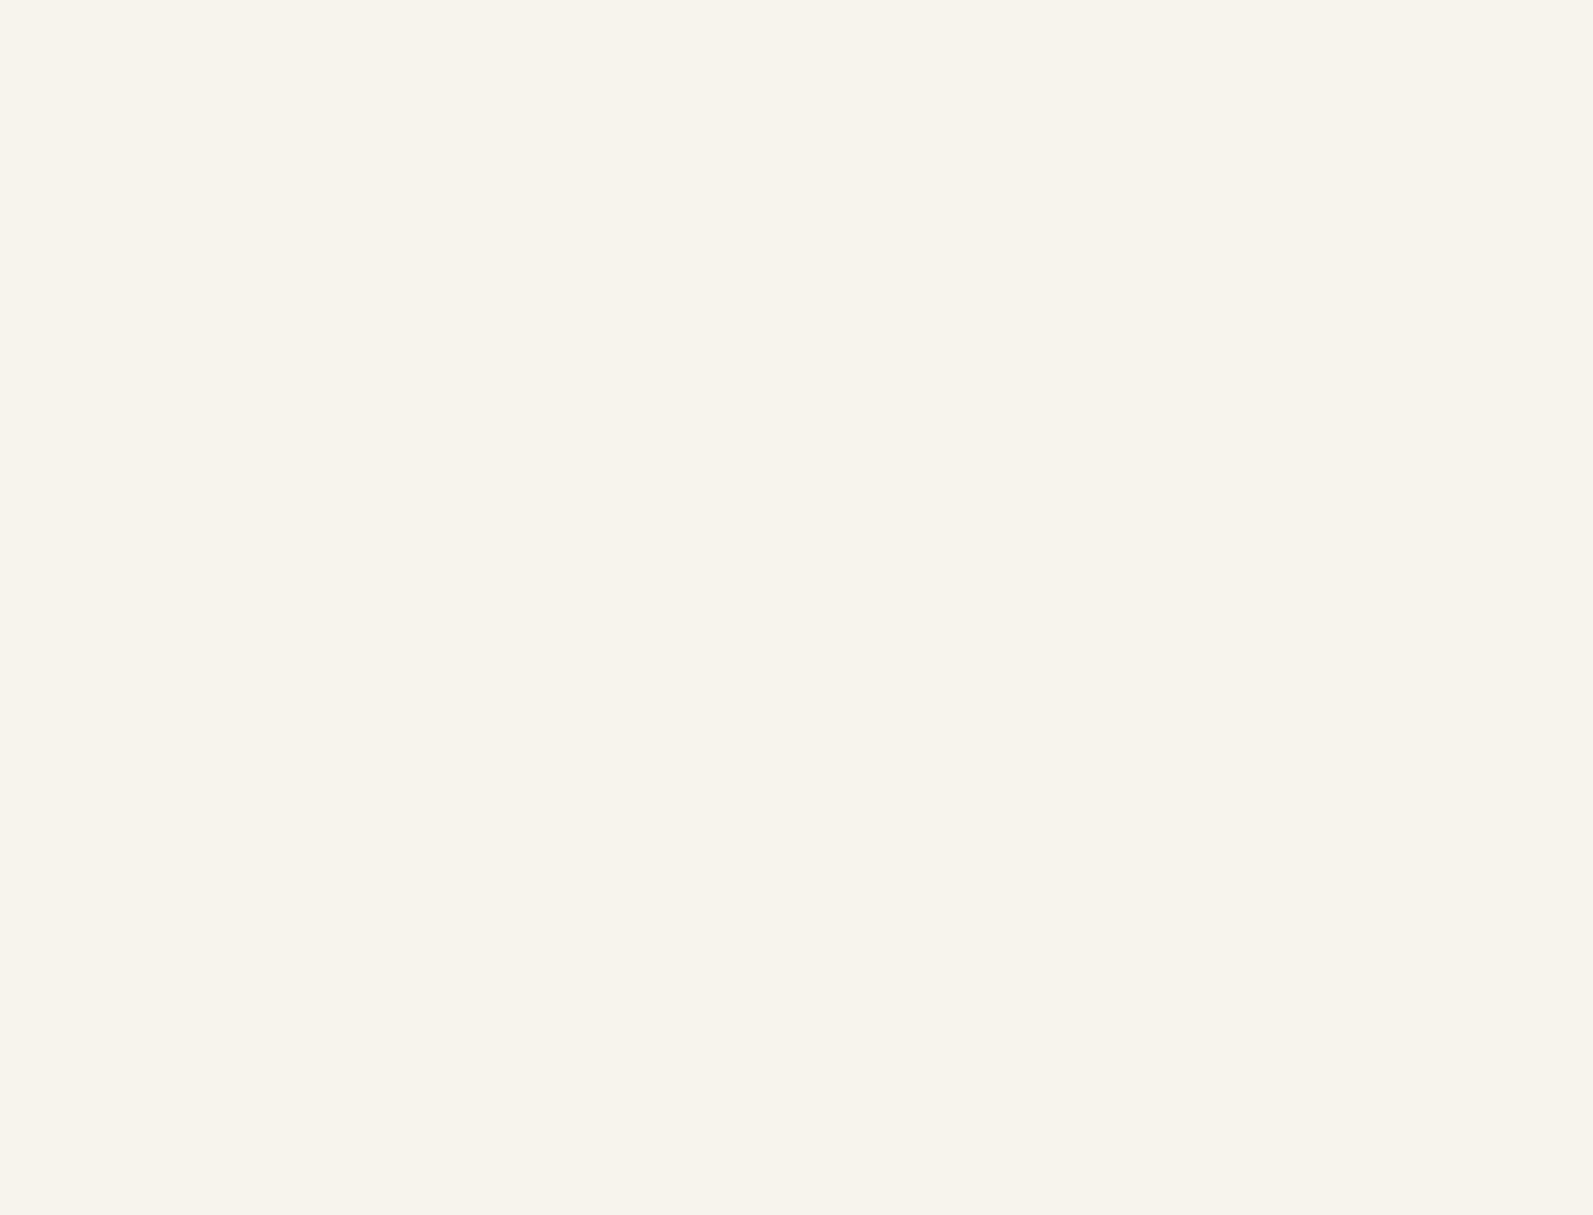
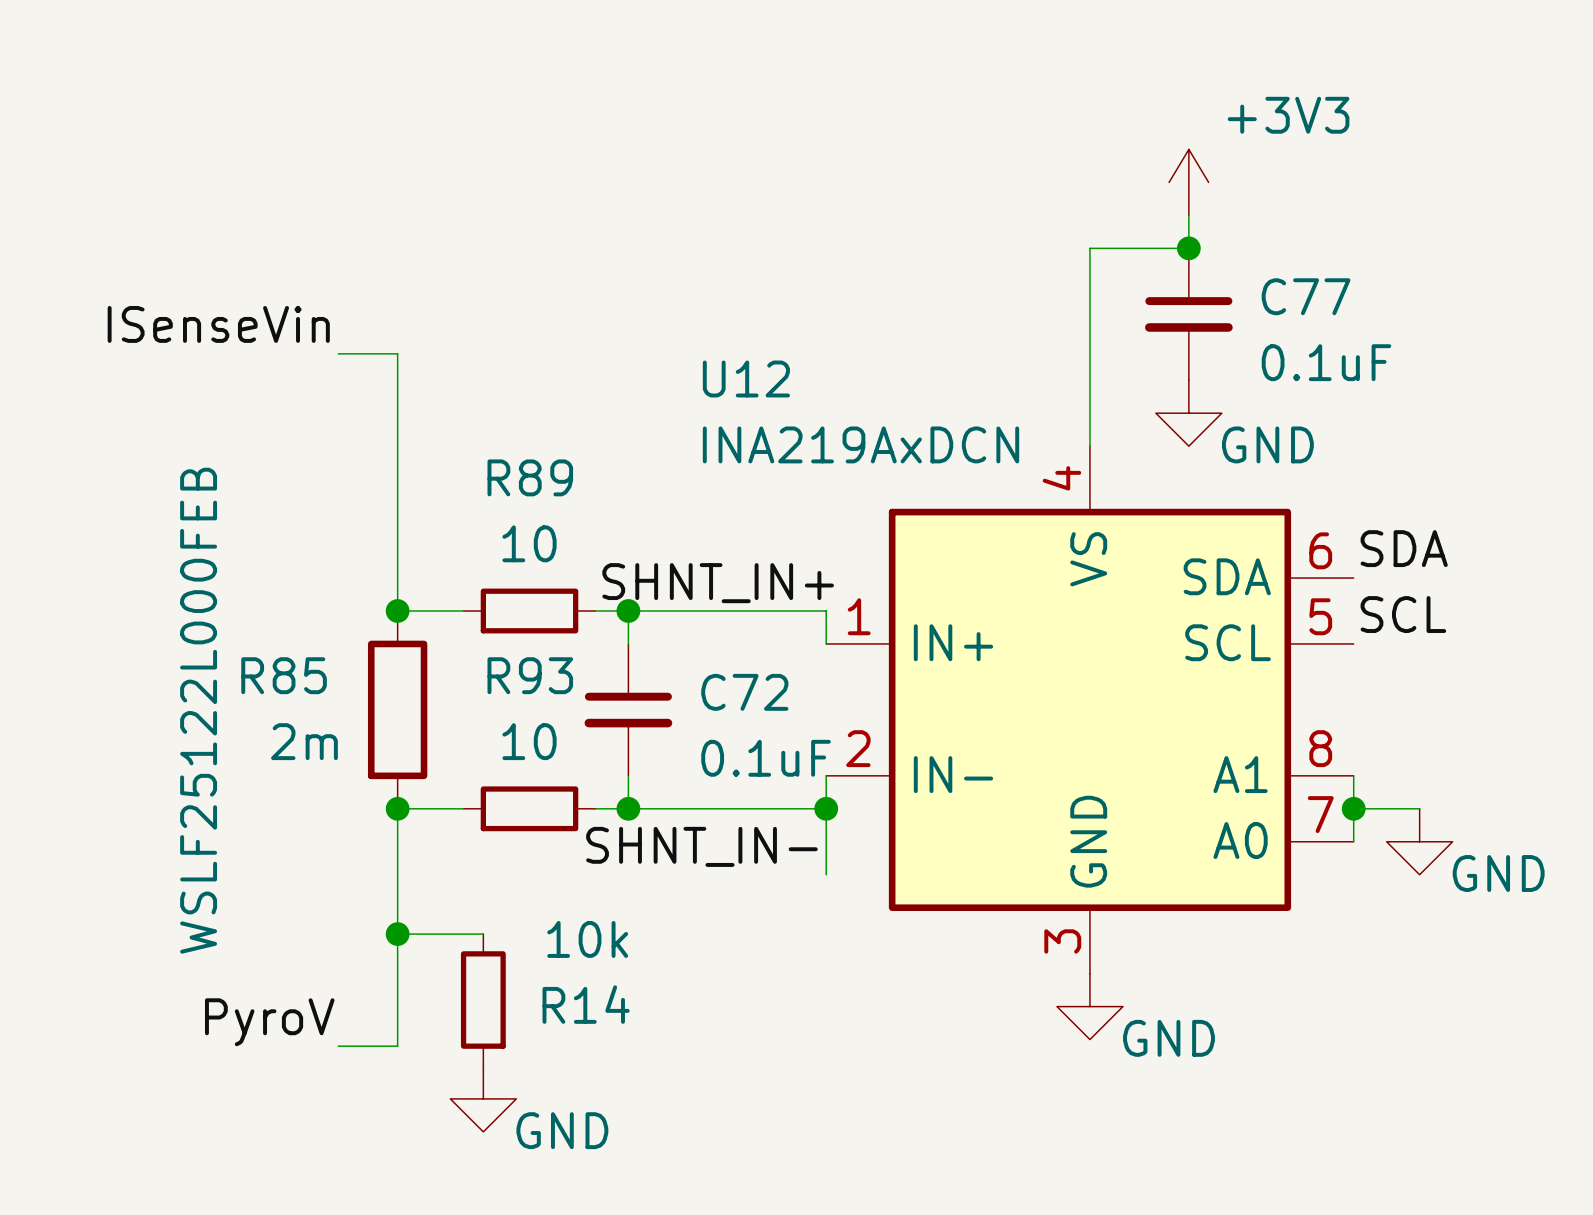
power symbol: none -> +3V3 (1188, 182)
wire: none -> (1188, 215) (1188, 248) (1089, 248) (1089, 446)
junction: none -> (1188, 248)
C77: none -> 0.1uF (1188, 314)
label: none -> ISenseVin (218, 324)
wire: none -> (338, 353) (397, 353) (397, 611) (463, 611)
power symbol: none -> GND (1188, 413)
label: none -> SDA (1404, 548)
label: none -> SHNT_IN+ (718, 583)
junction: none -> (397, 611)
R89: none -> 10 (529, 611)
wire: none -> (595, 611) (826, 611) (826, 643)
wire: none -> (628, 611) (628, 643)
junction: none -> (628, 611)
label: none -> SCL (1403, 614)
R85: none -> 2m (397, 709)
C72: none -> 0.1uF (628, 709)
U12: none -> INA219AxDCN (1089, 709)
wire: none -> (628, 775) (628, 808)
wire: none -> (826, 775) (826, 874)
wire: none -> (1353, 775) (1353, 841)
junction: none -> (397, 808)
wire: none -> (463, 808) (397, 808) (397, 1046) (338, 1046)
R93: none -> 10 (529, 808)
wire: none -> (595, 808) (826, 808)
junction: none -> (628, 808)
junction: none -> (826, 808)
wire: none -> (1353, 808) (1419, 808)
junction: none -> (1353, 808)
power symbol: none -> GND (1419, 841)
label: none -> SHNT_IN- (701, 846)
wire: none -> (397, 934) (483, 934)
junction: none -> (397, 934)
R14: none -> 10k (483, 1000)
power symbol: none -> GND (1089, 1006)
label: none -> PyroV (269, 1022)
power symbol: none -> GND (483, 1098)

